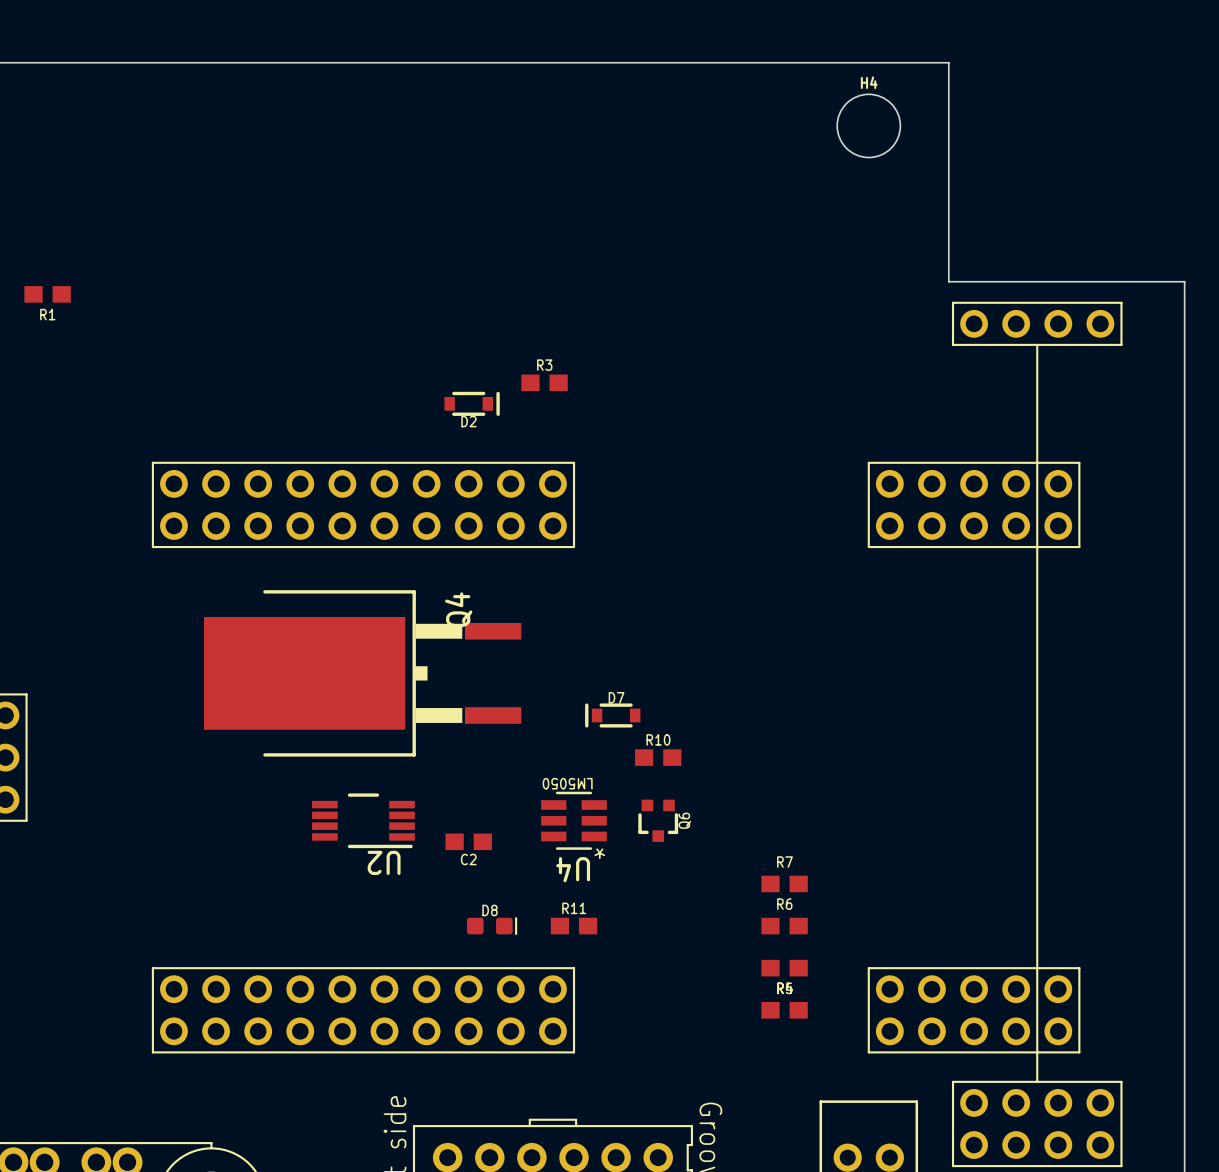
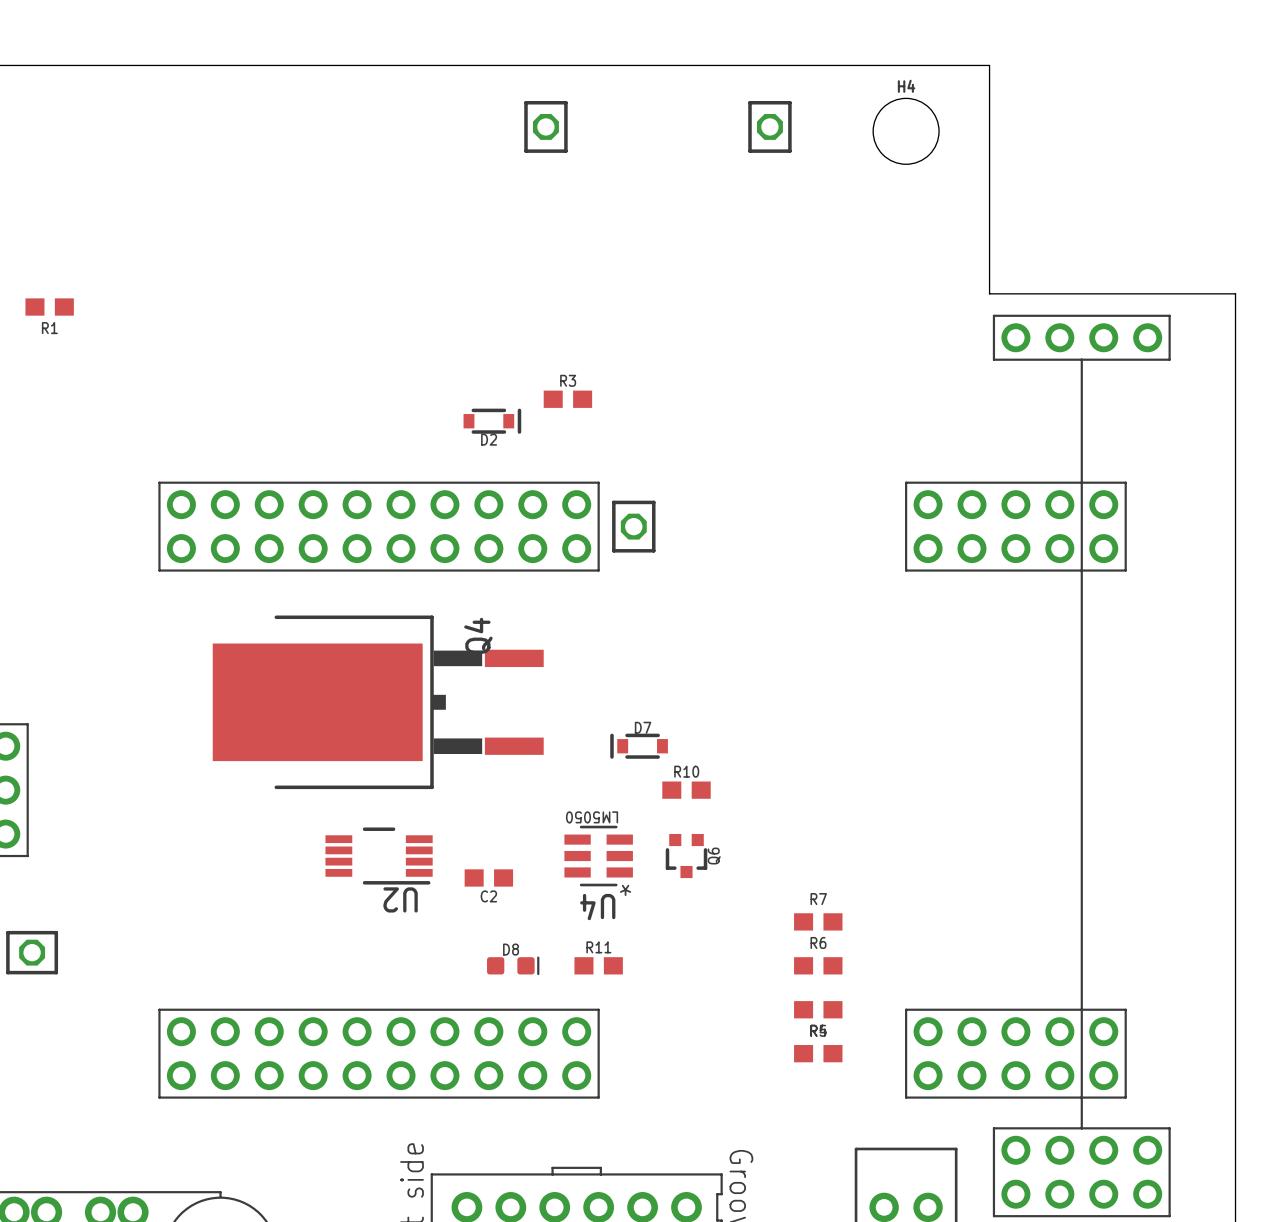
part: none -> (545, 126)
part: none -> (769, 126)
part: none -> (633, 526)
part: none -> (32, 952)

